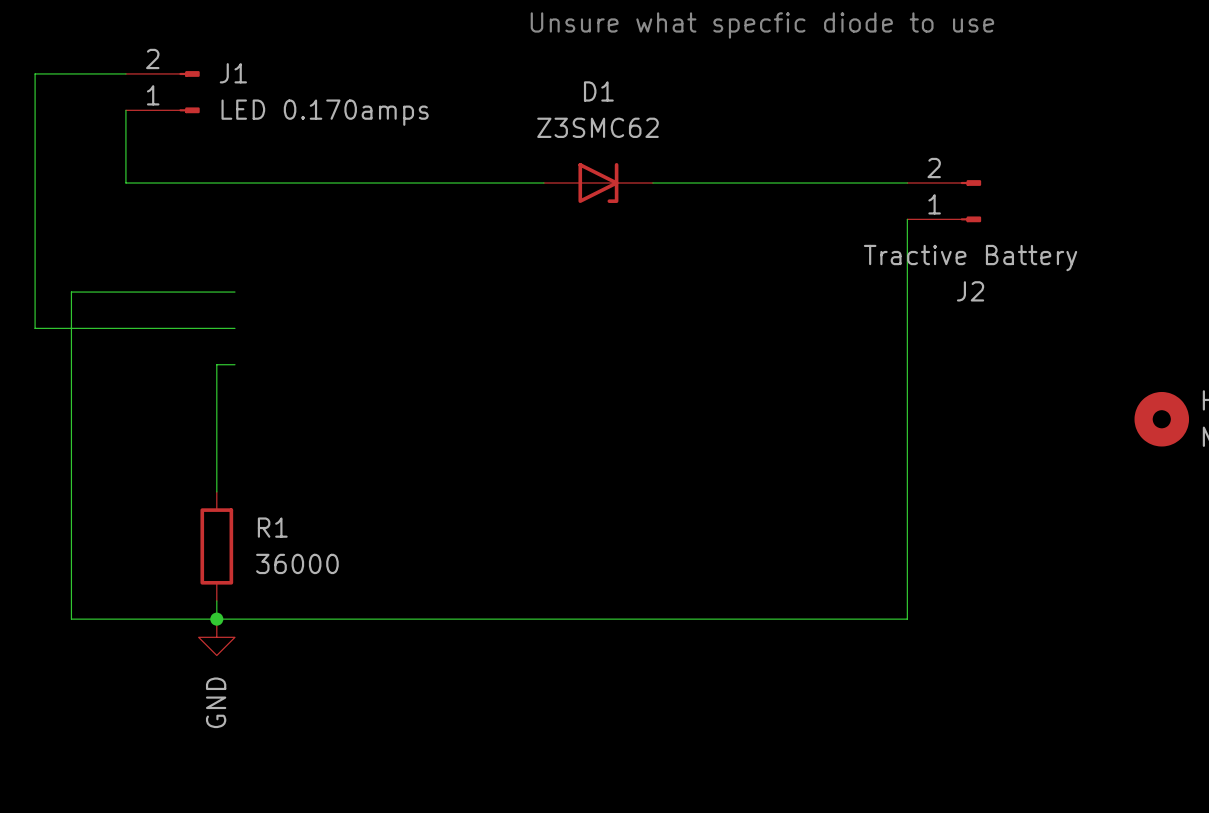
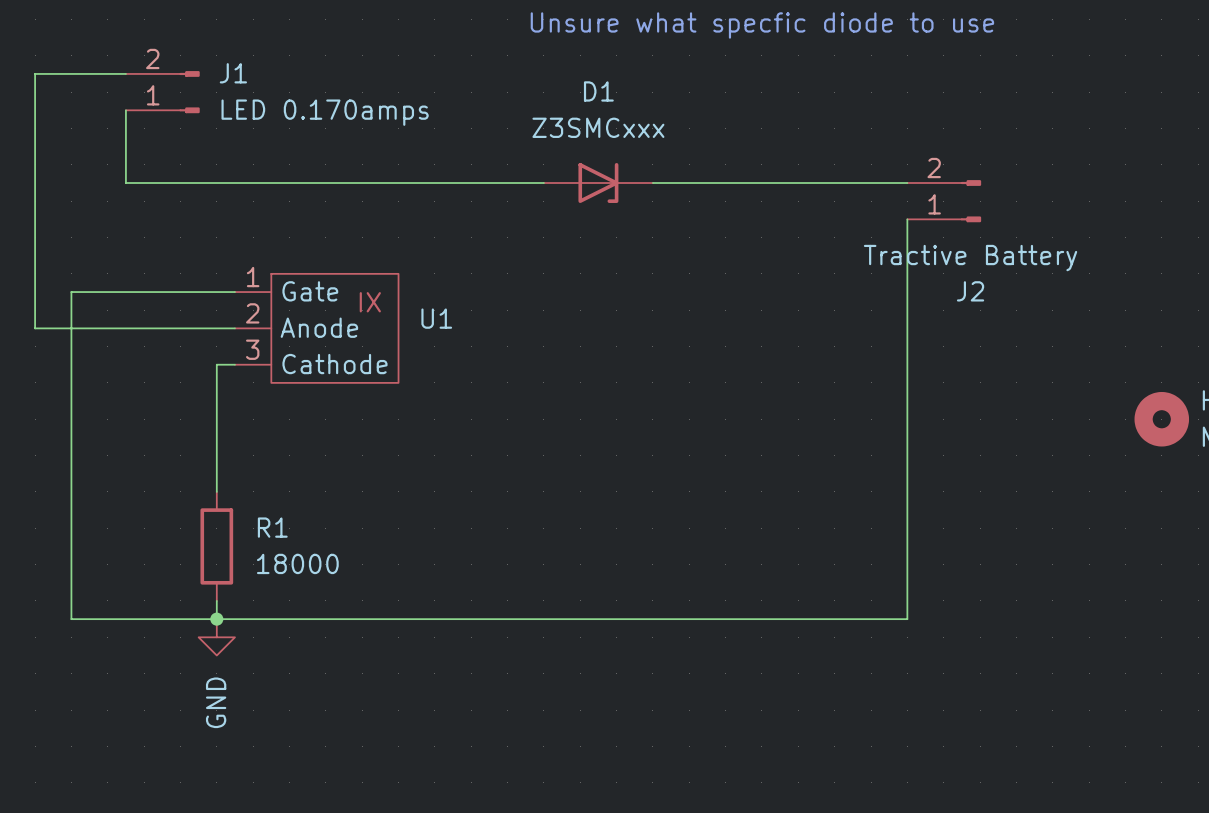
D1 value: Z3SMC62 (597, 127) -> Z3SMCxxx (598, 127)
U1: none -> (316, 337)
R1 value: 36000 (297, 563) -> 18000 (297, 563)

